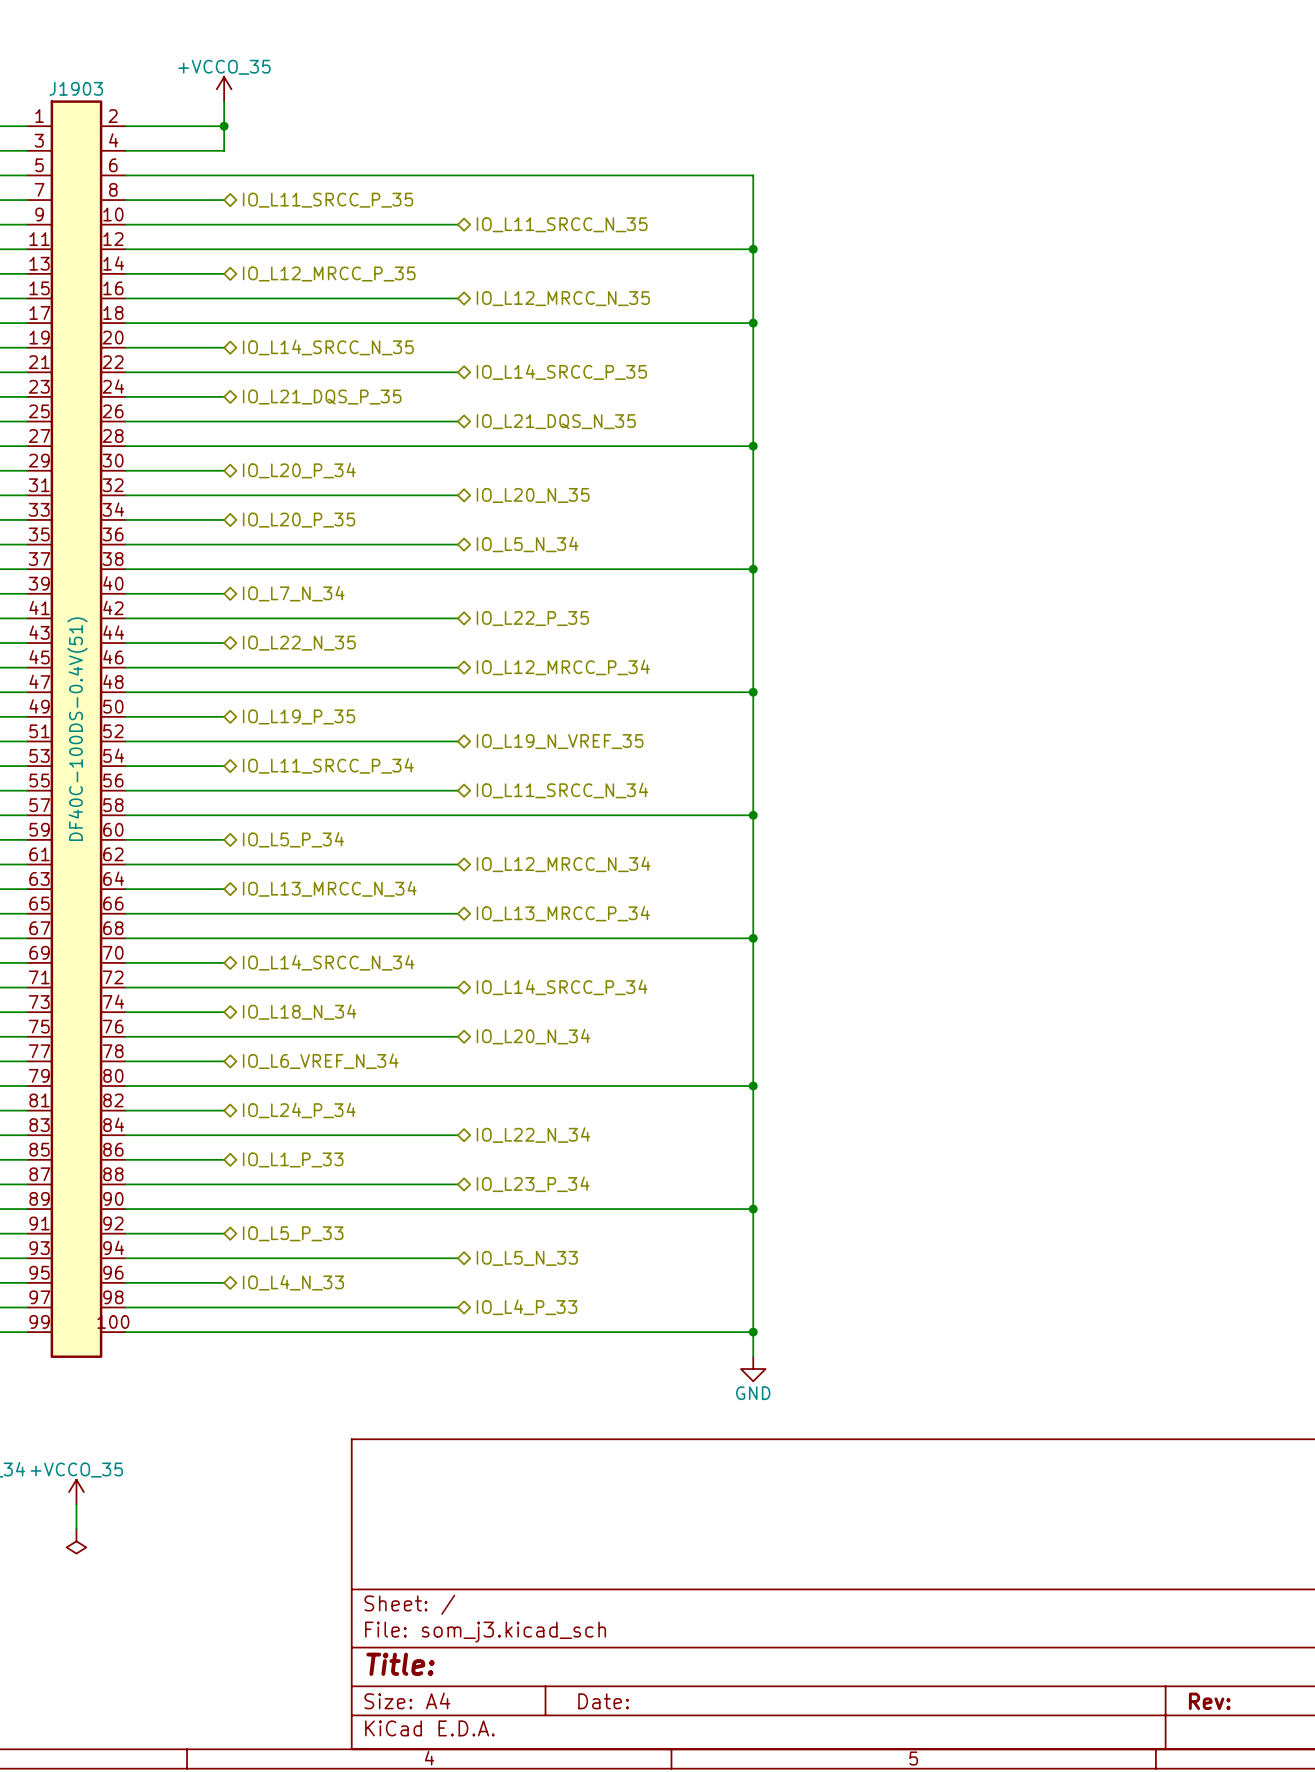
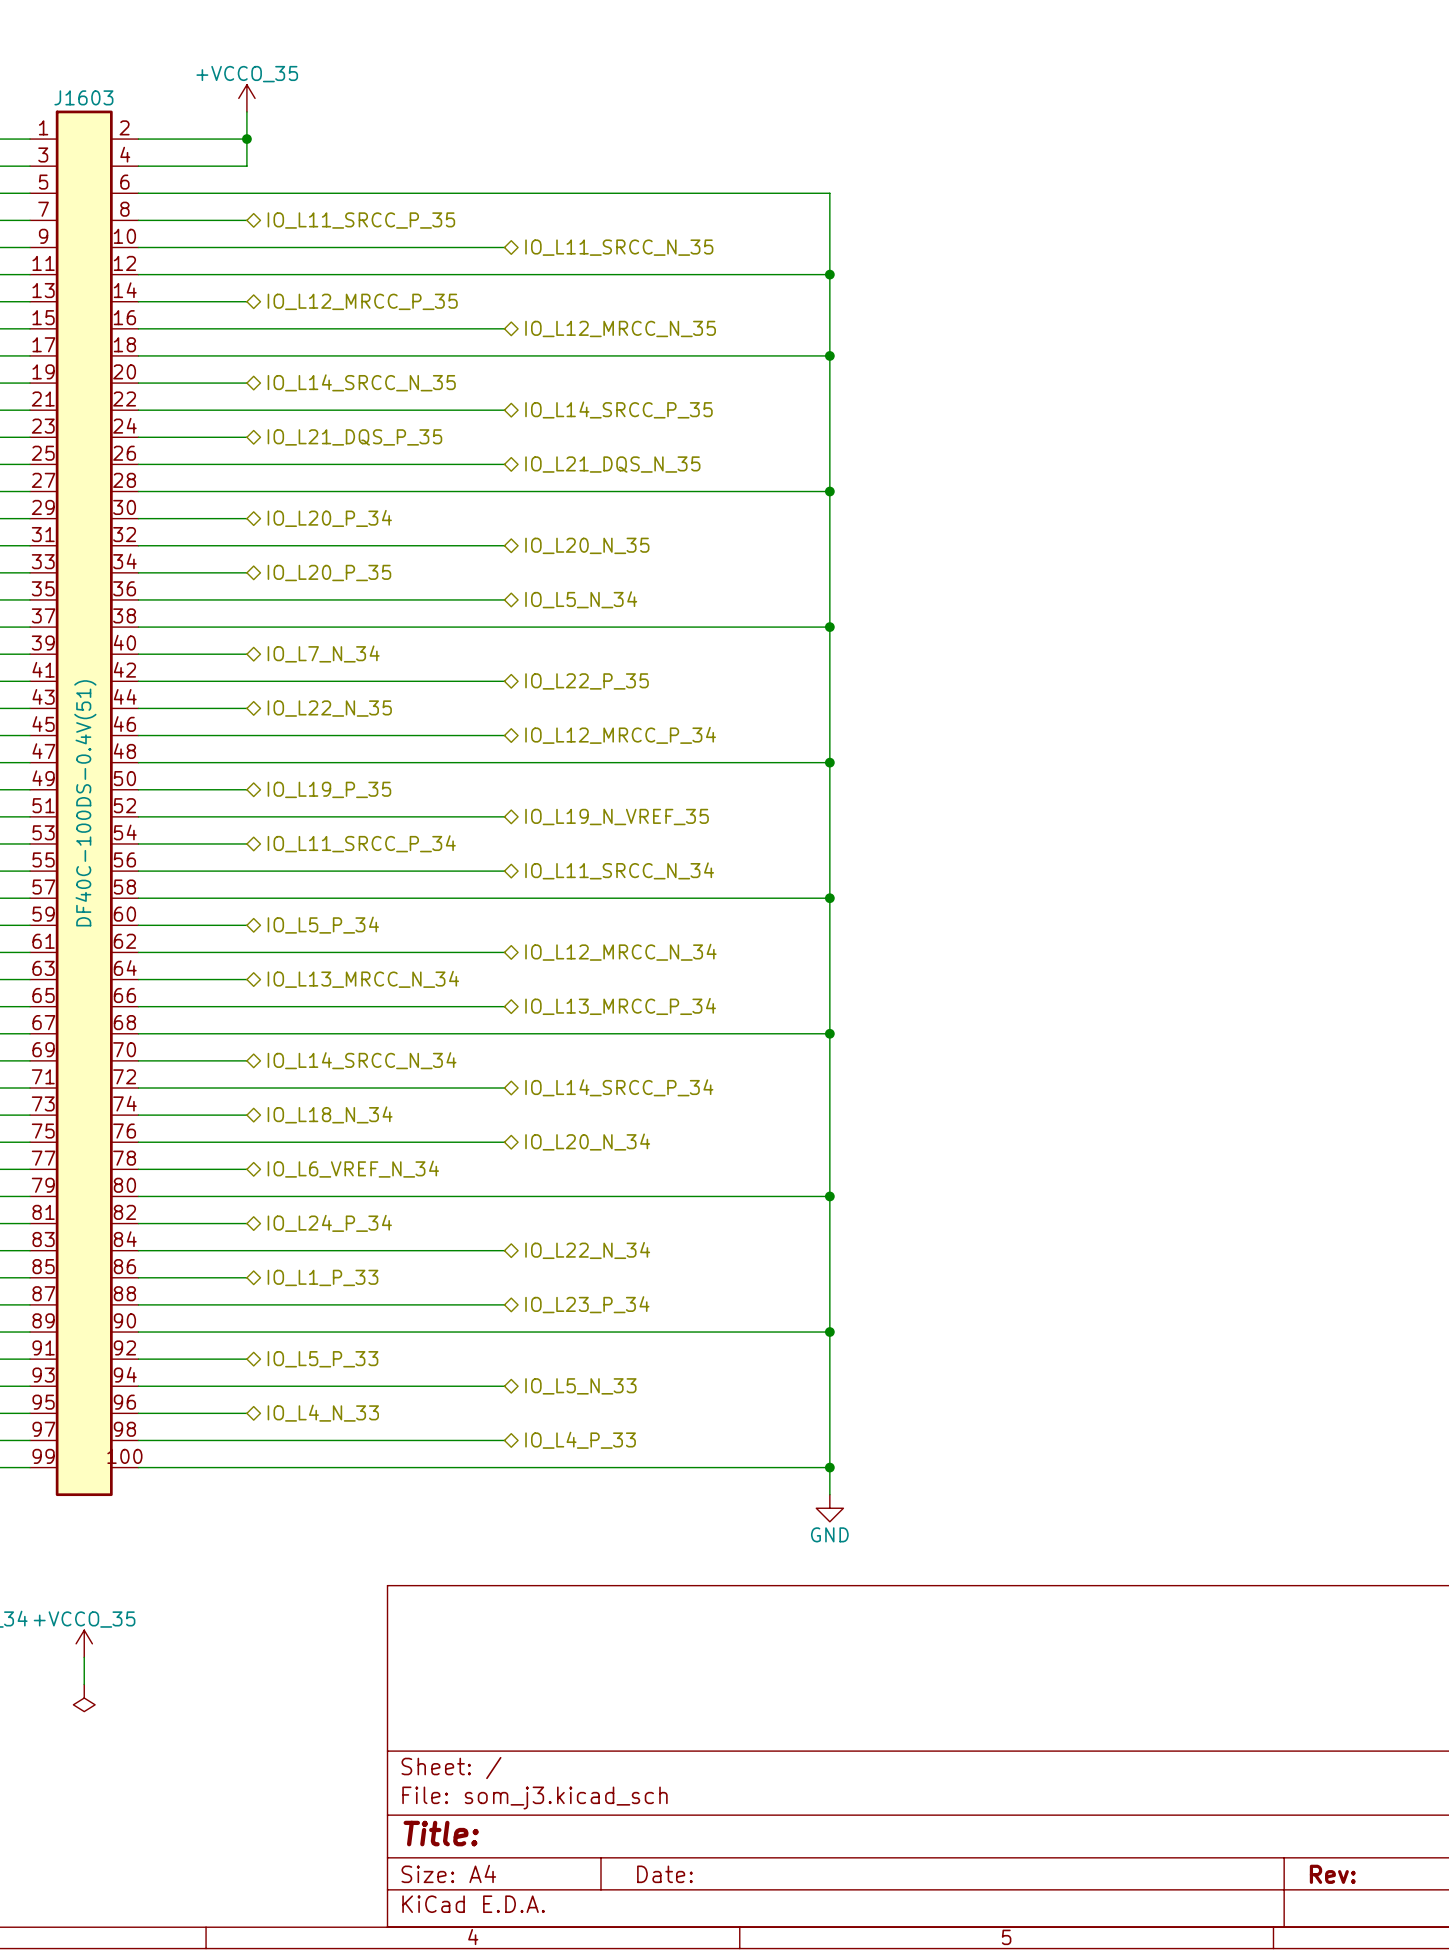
J1903 name: J1903 (76, 88) -> J1603 (83, 97)

